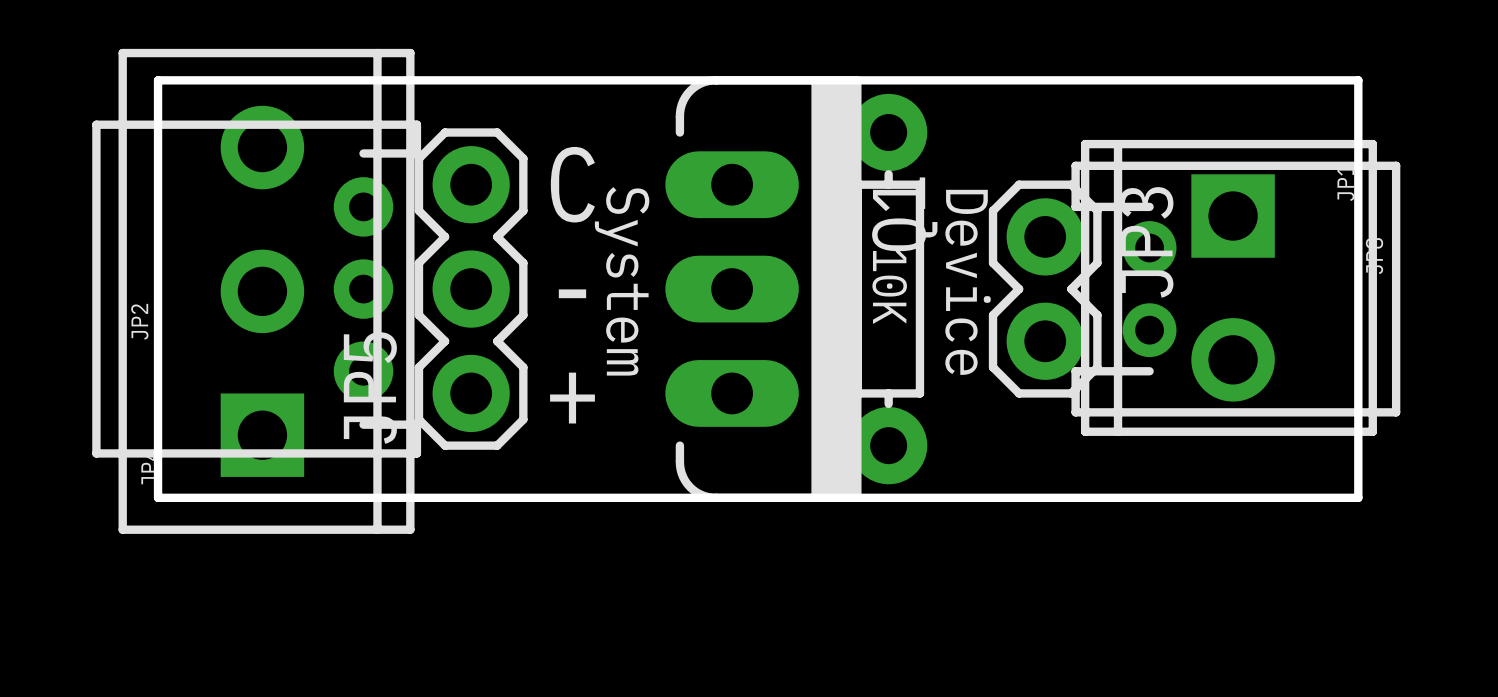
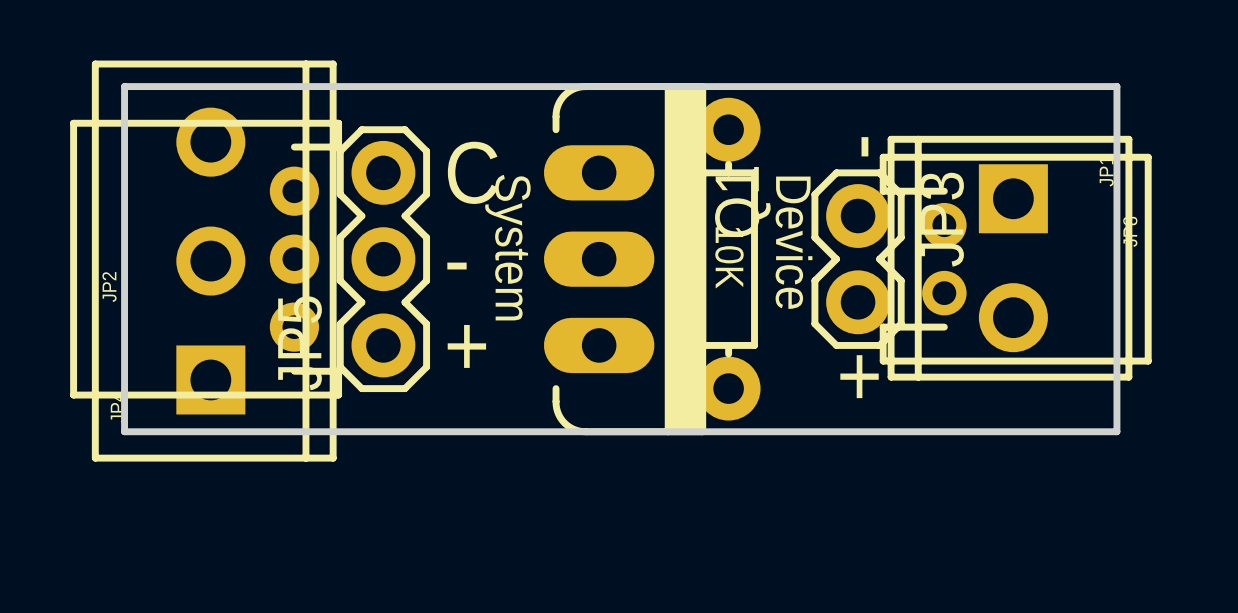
text: none -> - (864, 146)
text: none -> + (859, 376)

